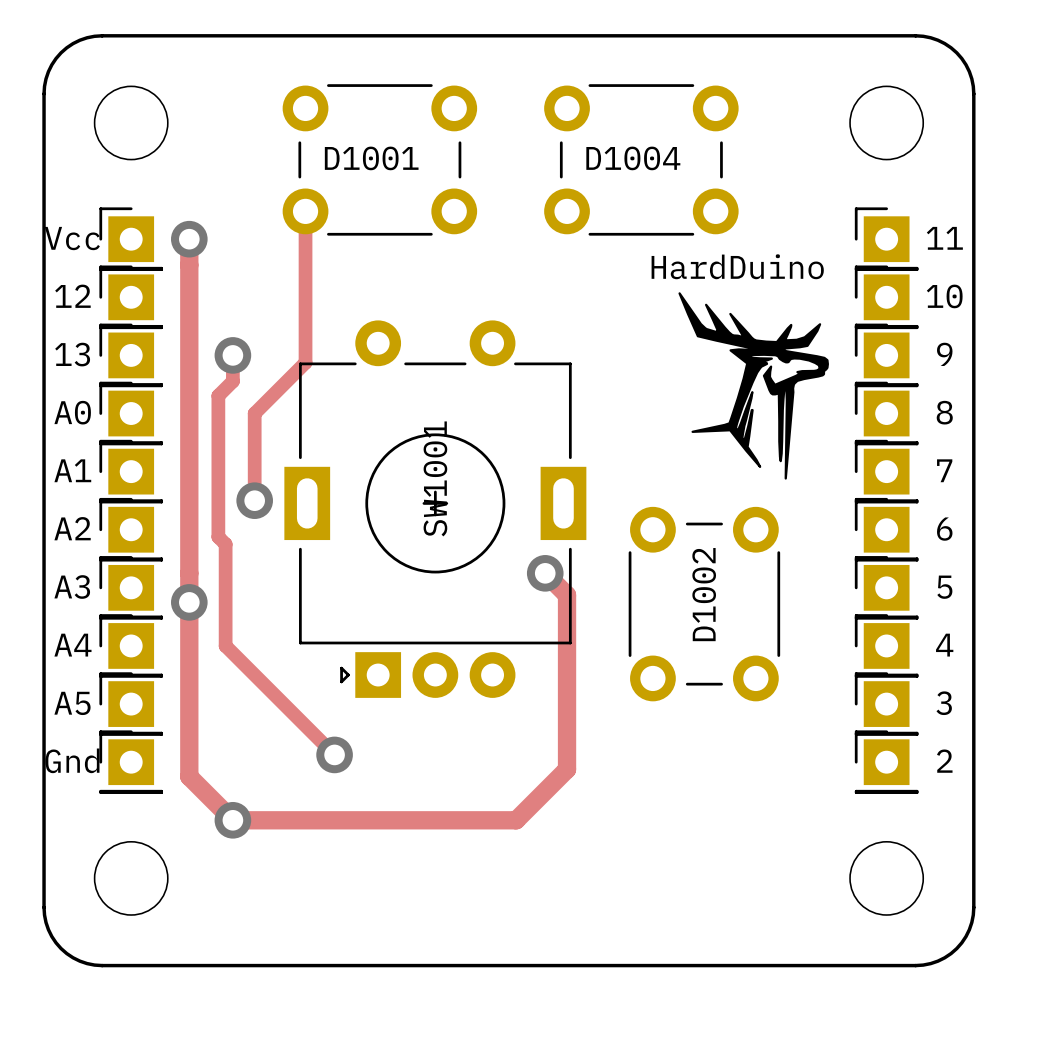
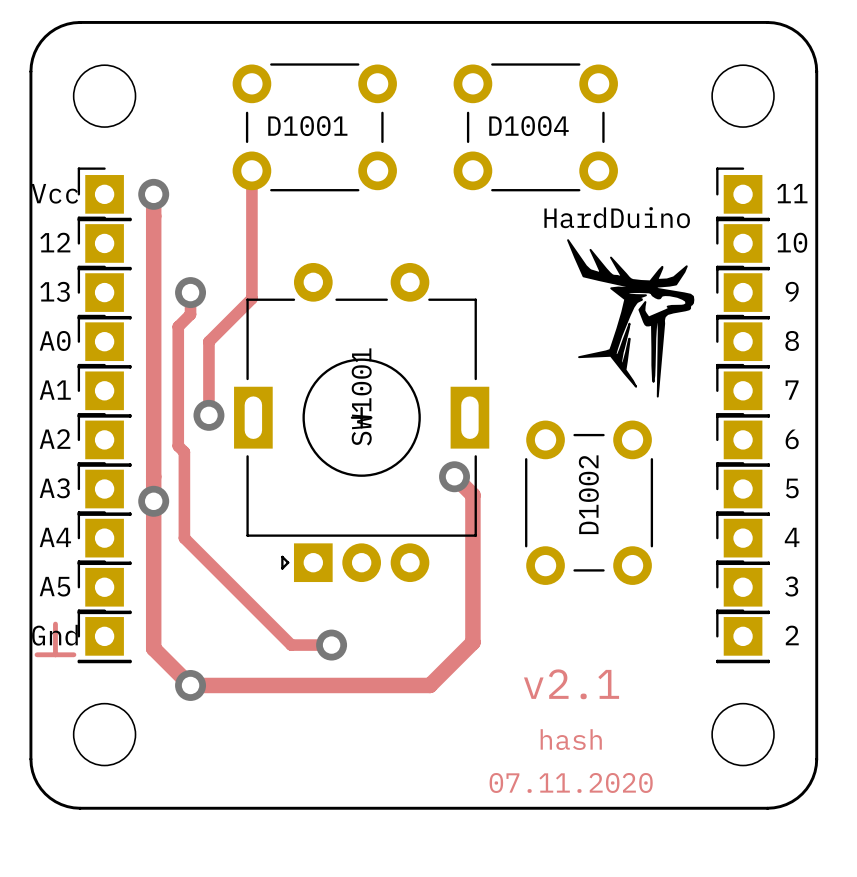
track: none -> (55, 624) (55, 654)
track: none -> (276, 630) (291, 645) (331, 645)
via position: (334, 754) -> (331, 645)
track: none -> (37, 654) (73, 654)
text: none -> v2.1 (571, 684)
text: none -> hash (571, 739)
text: none -> 07.11.2020 (571, 782)

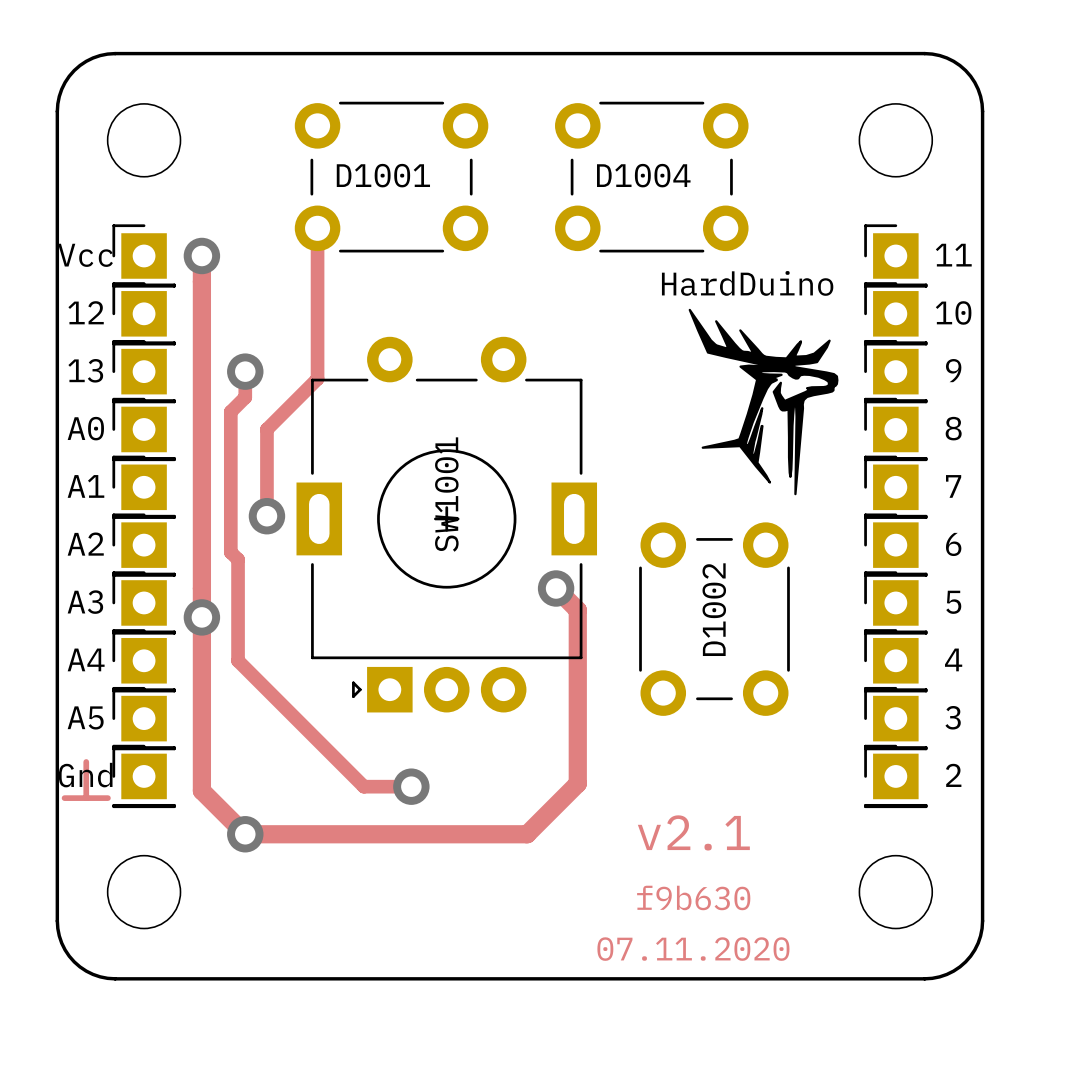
text: hash (571, 739) -> f9b630 (693, 897)

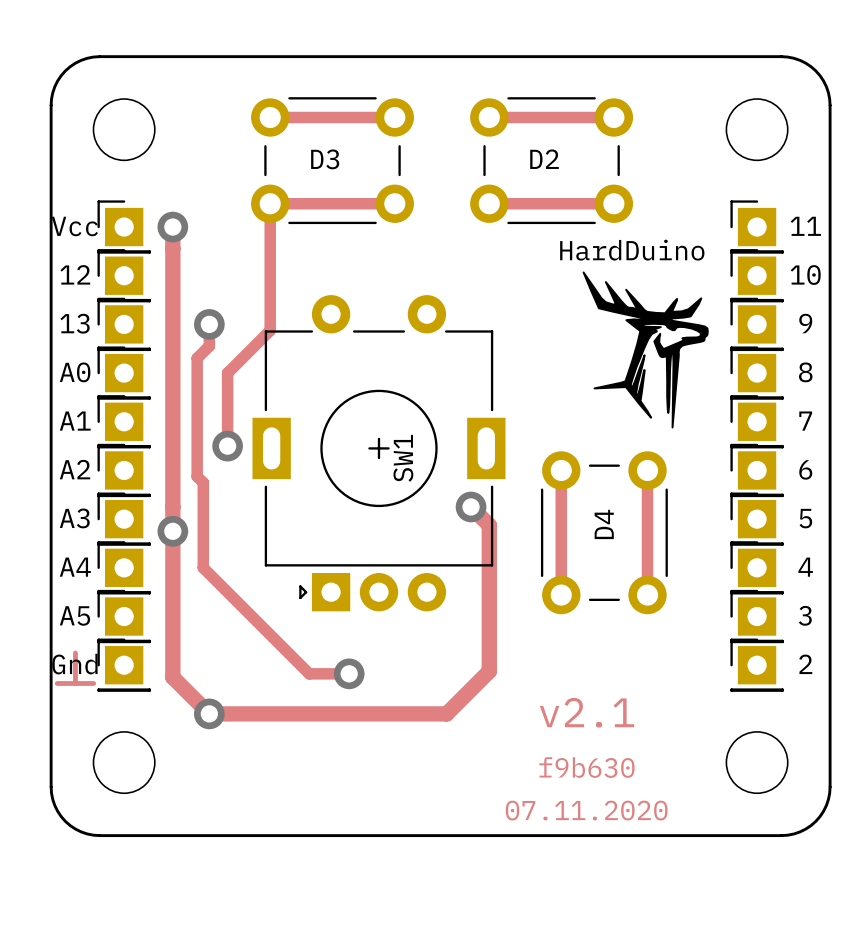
track: none -> (270, 117) (394, 117)
track: none -> (489, 117) (613, 117)
D1001 name: D1001 (383, 175) -> D3 (325, 159)
D1004 name: D1004 (643, 175) -> D2 (544, 159)
track: none -> (270, 203) (394, 203)
track: none -> (489, 203) (613, 203)
SW1001 name: SW1001 (446, 494) -> SW1 (403, 458)
track: none -> (561, 470) (561, 595)
track: none -> (647, 470) (647, 595)
D1002 name: D1002 (714, 609) -> D4 (604, 524)

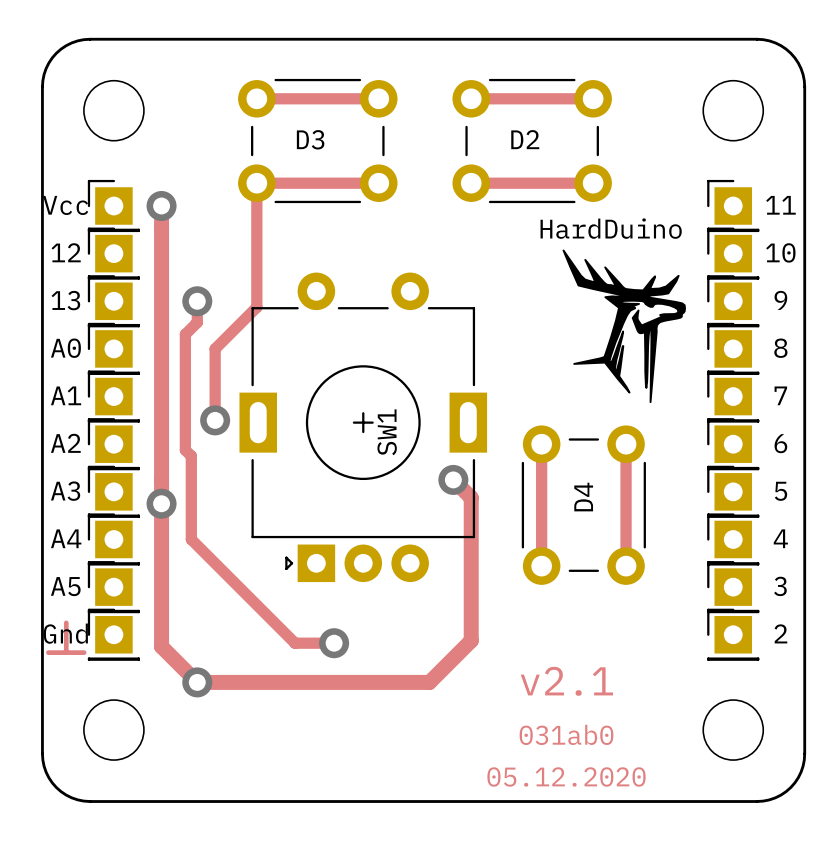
text: f9b630 (586, 767) -> 031ab0 (566, 734)
text: 07.11.2020 (586, 810) -> 05.12.2020 (566, 776)

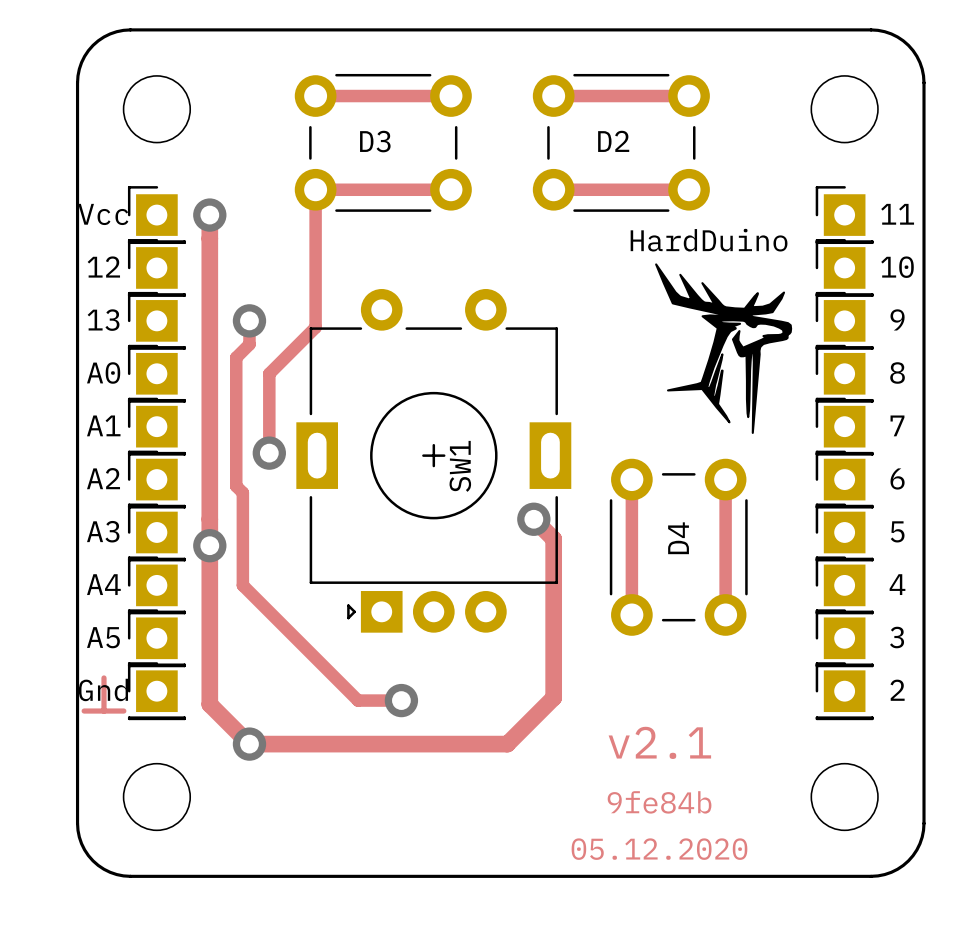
text: 031ab0 (566, 734) -> 9fe84b (659, 802)

